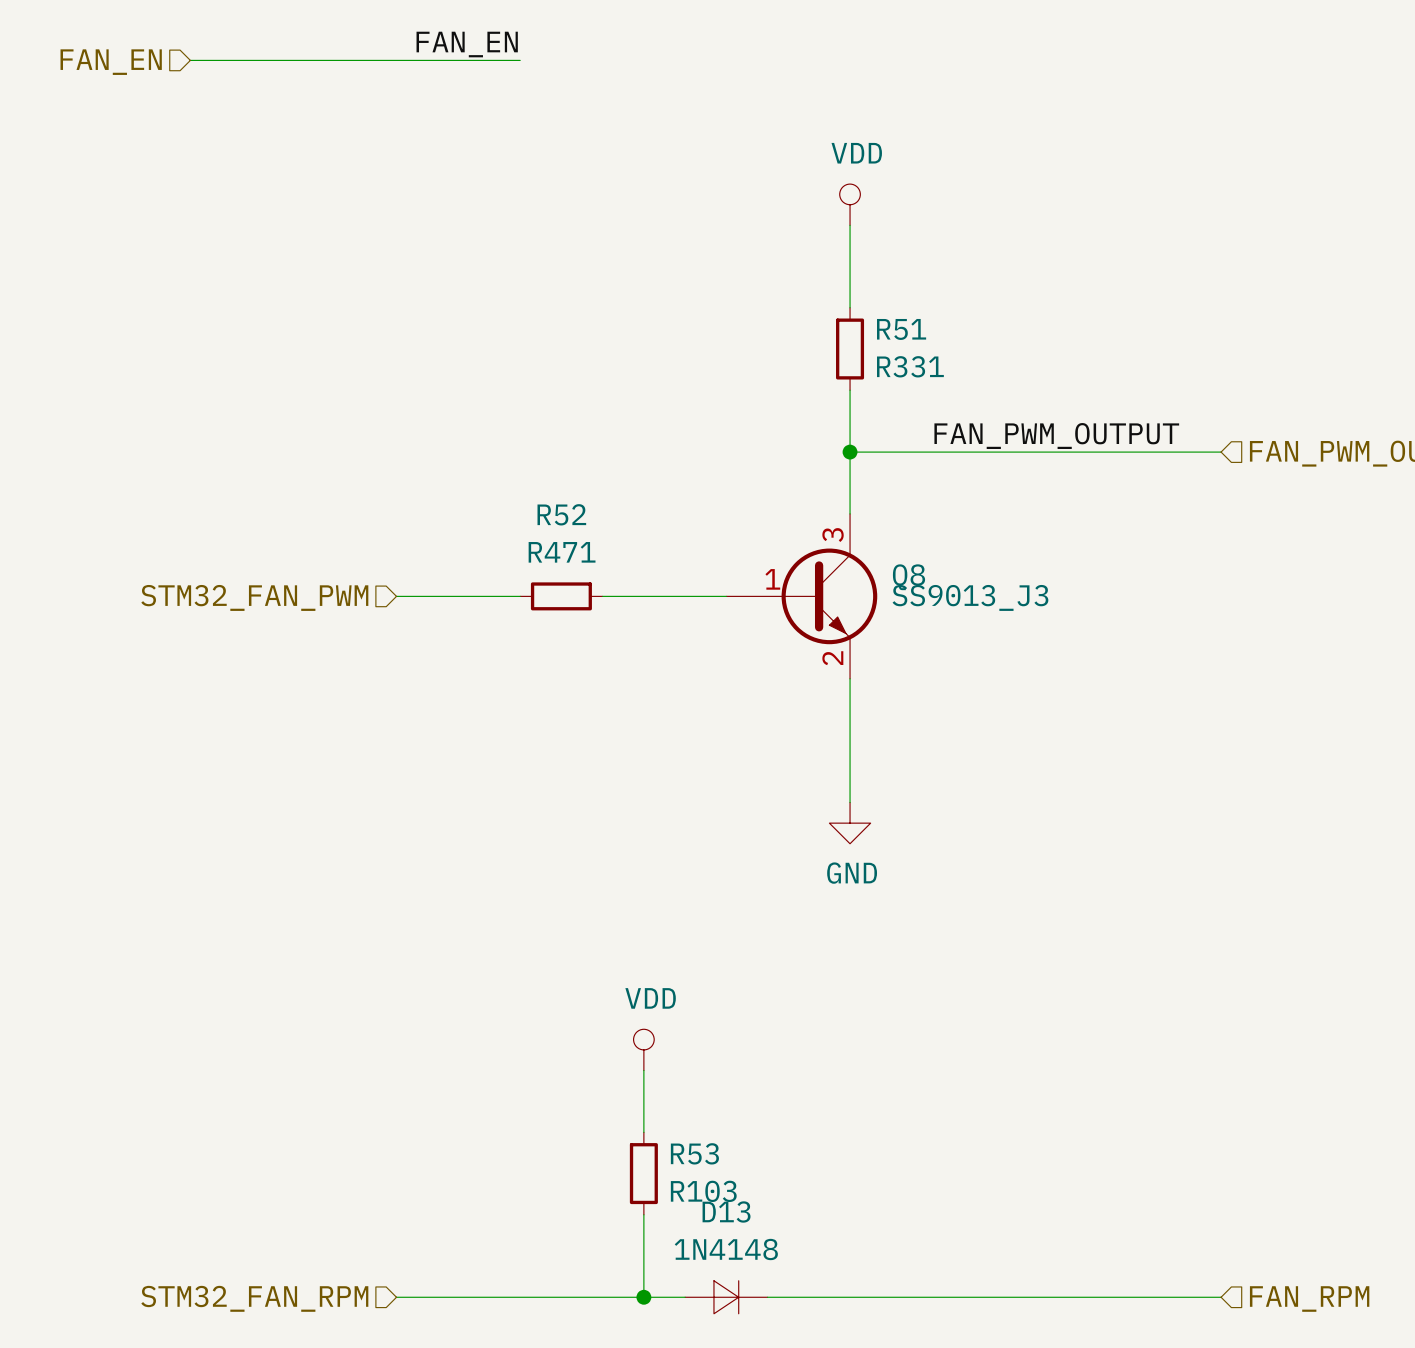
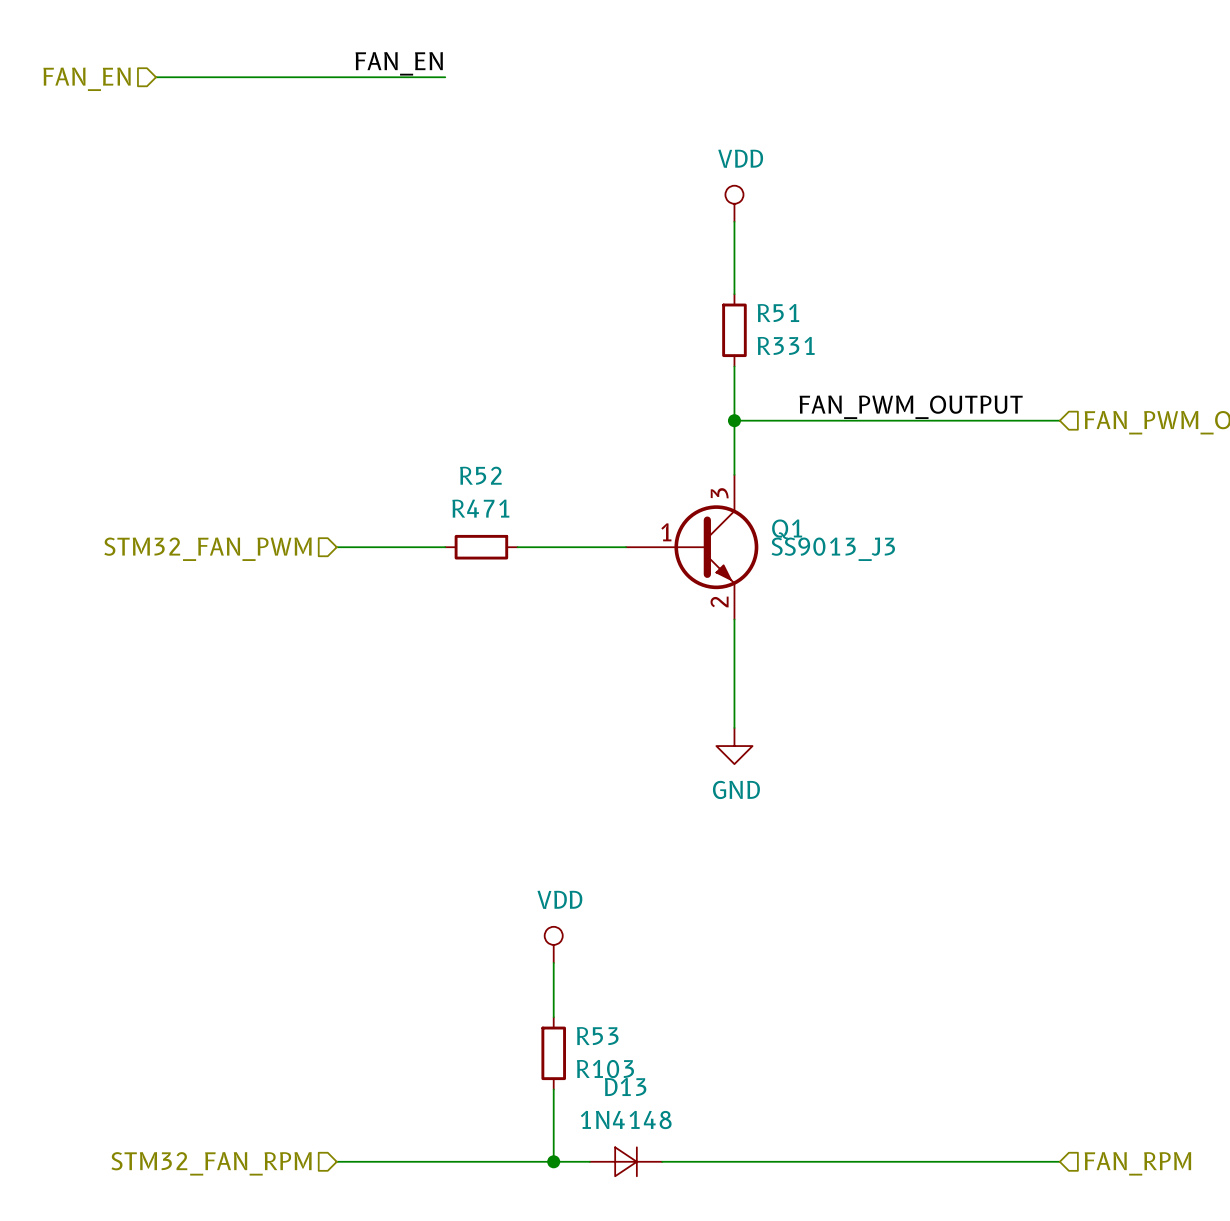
Q8 name: Q8 (908, 577) -> Q1 (787, 529)

